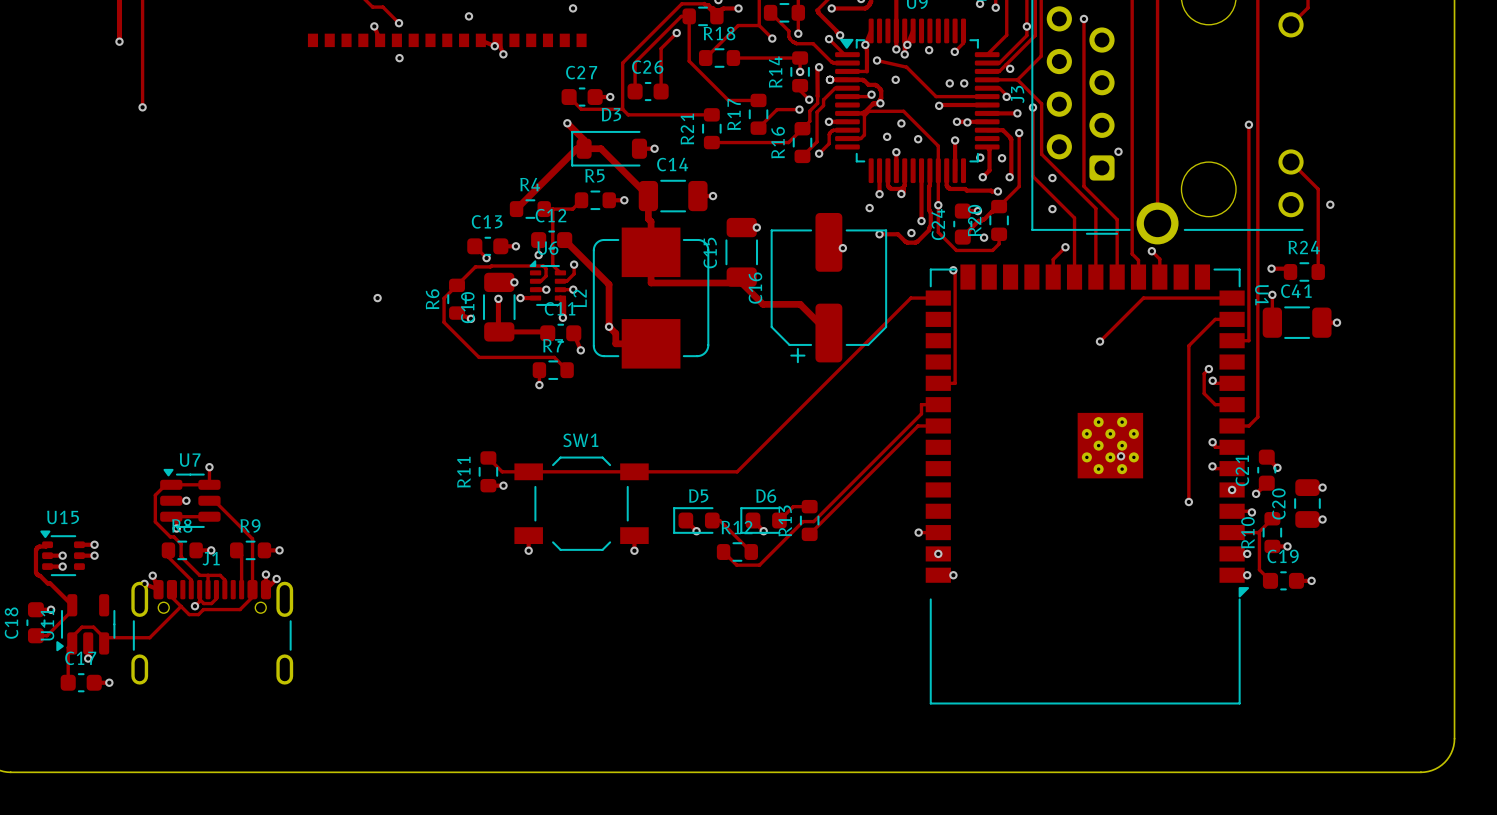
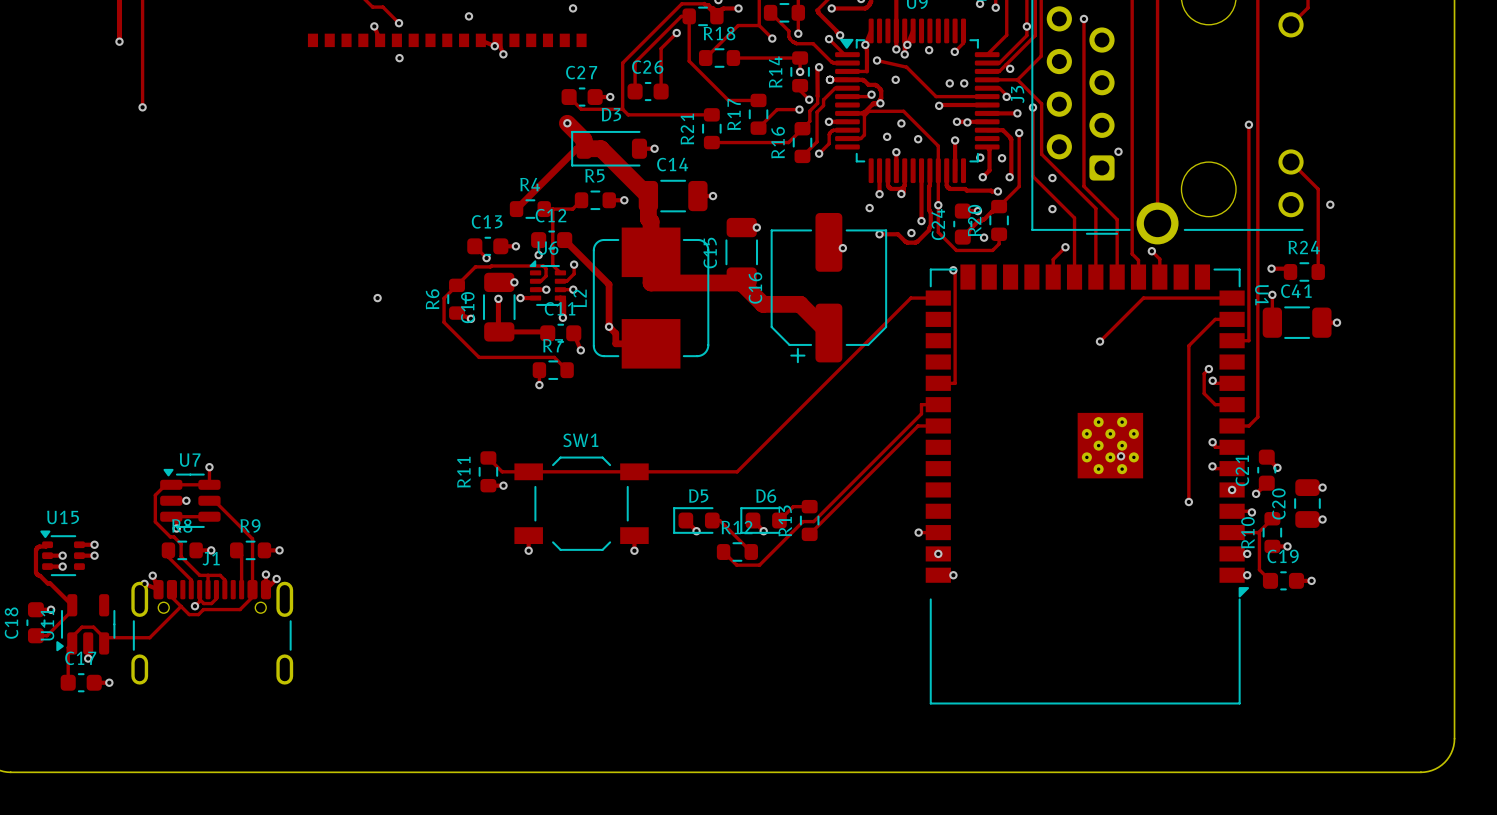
track width: thin (567, 123) (584, 139) (584, 148) (601, 148) (648, 196) (648, 218) (651, 221) (651, 282) (741, 282) -> thick (567, 123) (584, 139) (584, 148) (601, 148) (648, 196) (648, 218) (651, 221) (651, 282) (741, 282)
track width: thin (741, 282) (763, 304) (800, 304) (828, 333) -> thick (741, 282) (763, 304) (800, 304) (828, 333)

